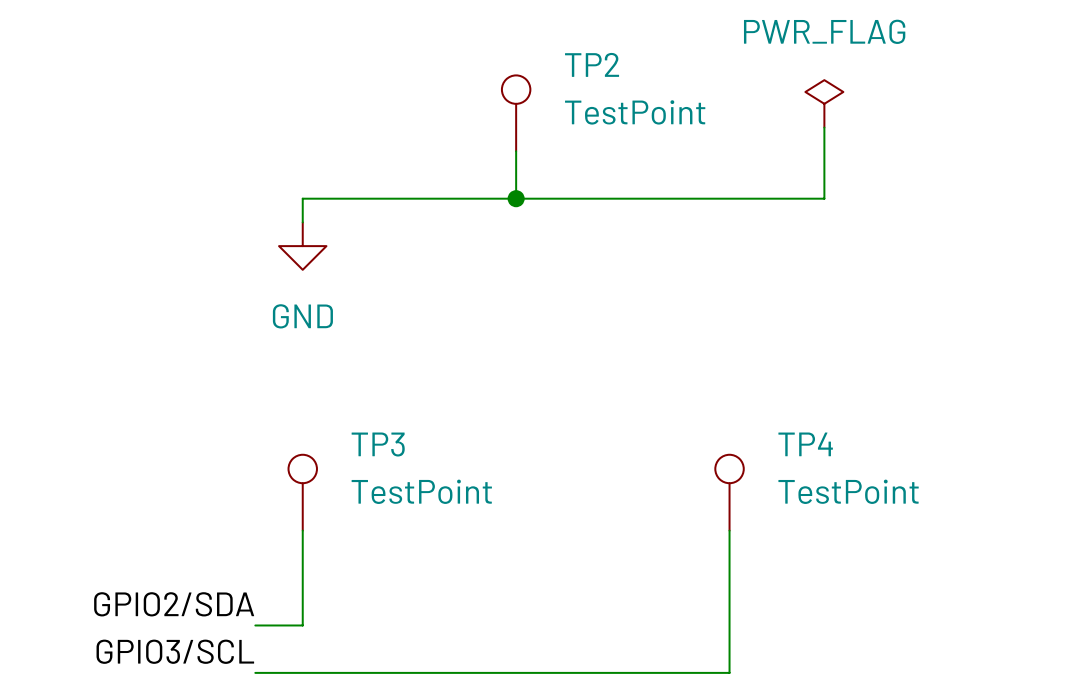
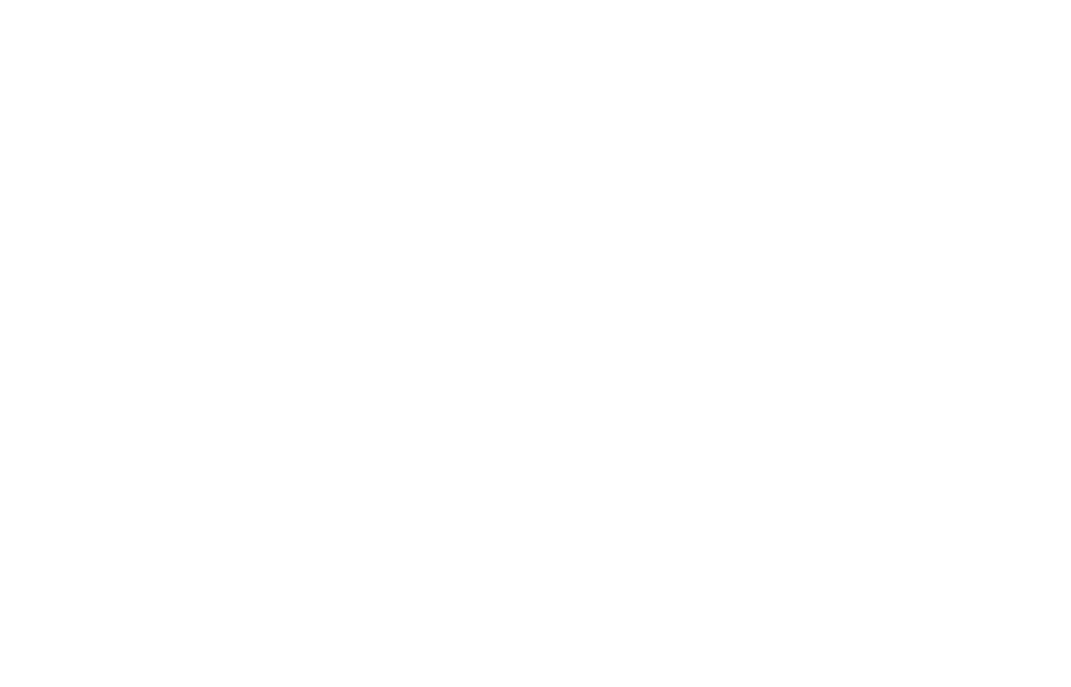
power symbol: PWR_FLAG (824, 103) -> none
TP2: TestPoint (516, 113) -> none
wire: (824, 127) (824, 198) (302, 198) (302, 222) -> none
wire: (516, 151) (516, 198) -> none
junction: (516, 198) -> none
power symbol: GND (302, 246) -> none
TP3: TestPoint (302, 492) -> none
TP4: TestPoint (729, 492) -> none
wire: (302, 530) (302, 625) (255, 625) -> none
wire: (729, 530) (729, 672) (255, 672) -> none
label: GPIO2/SDA (174, 604) -> none
label: GPIO3/SCL (175, 651) -> none

